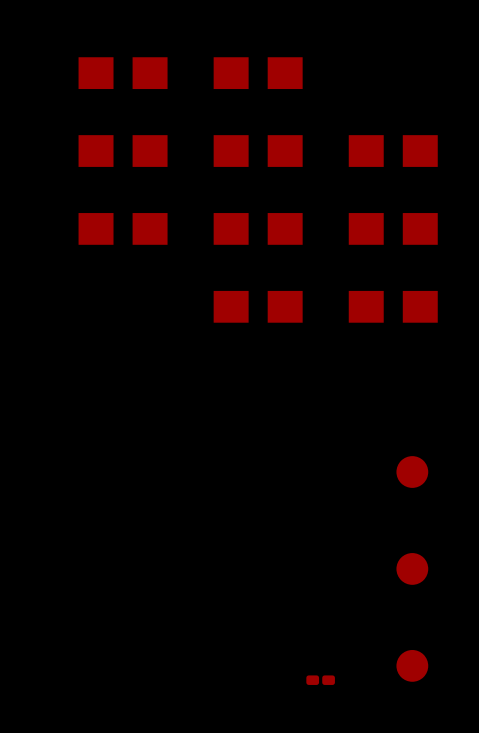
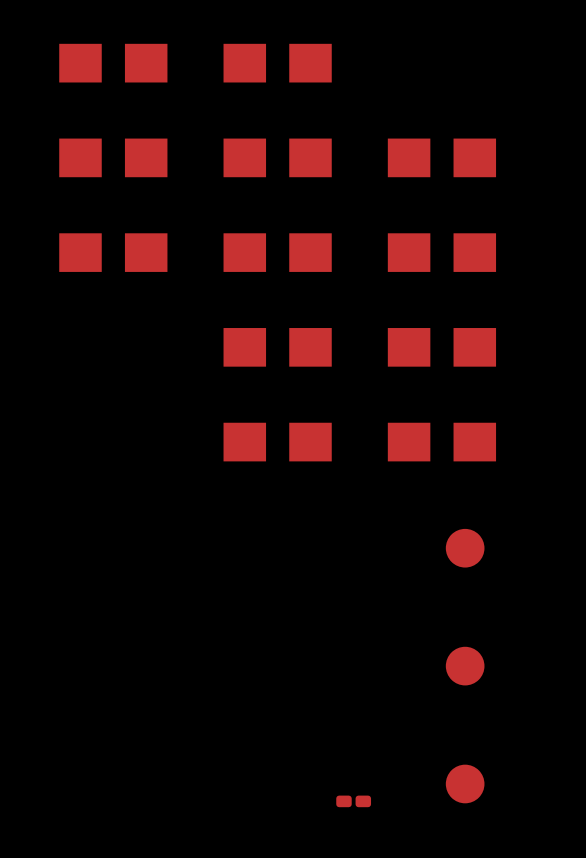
part: none -> (277, 442)
part: none -> (441, 442)

